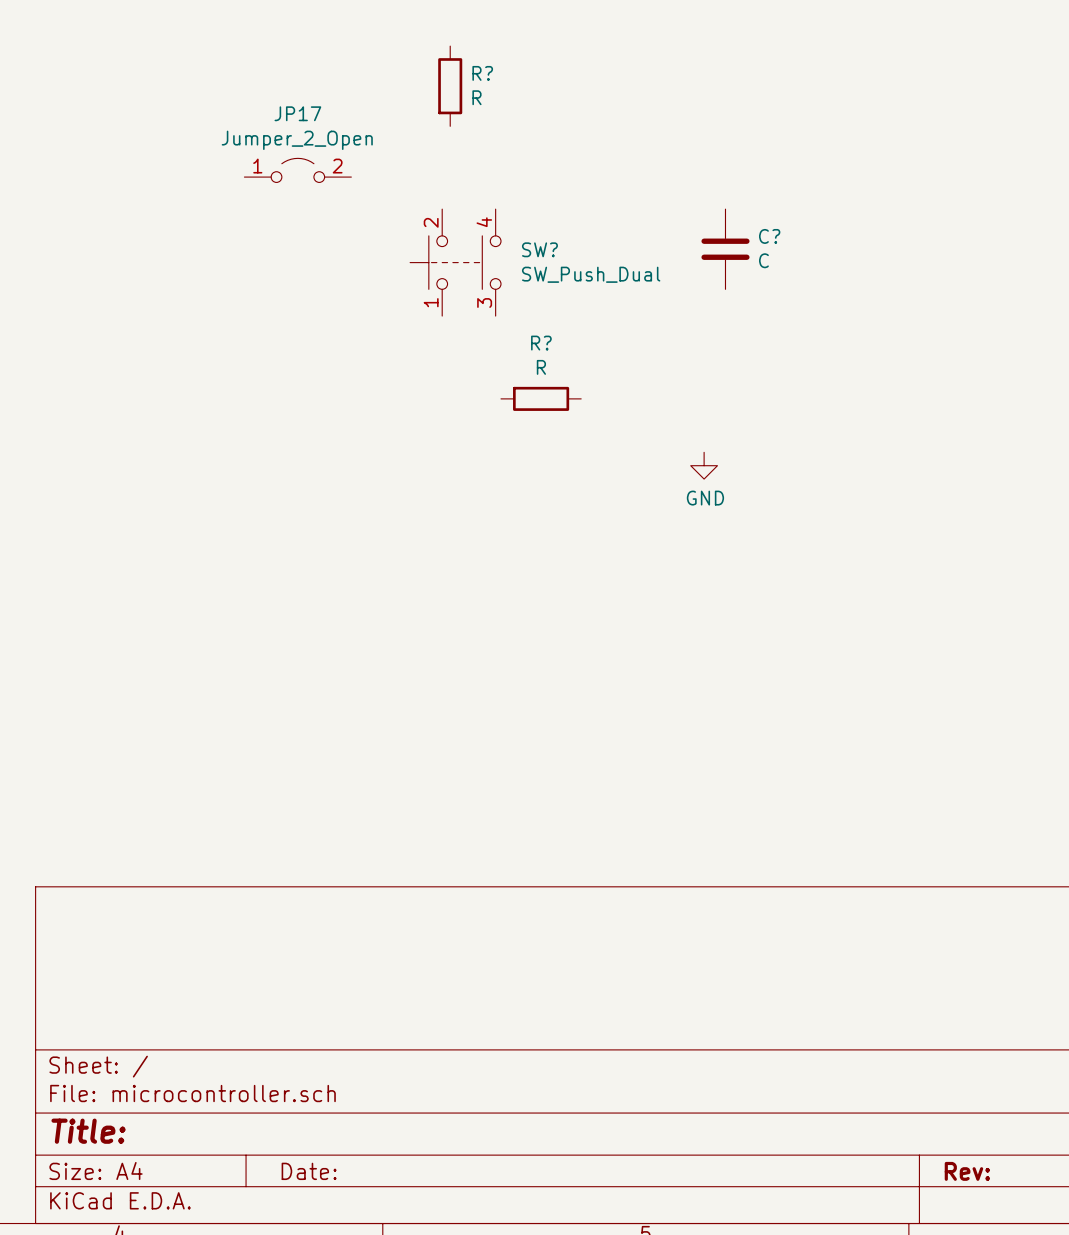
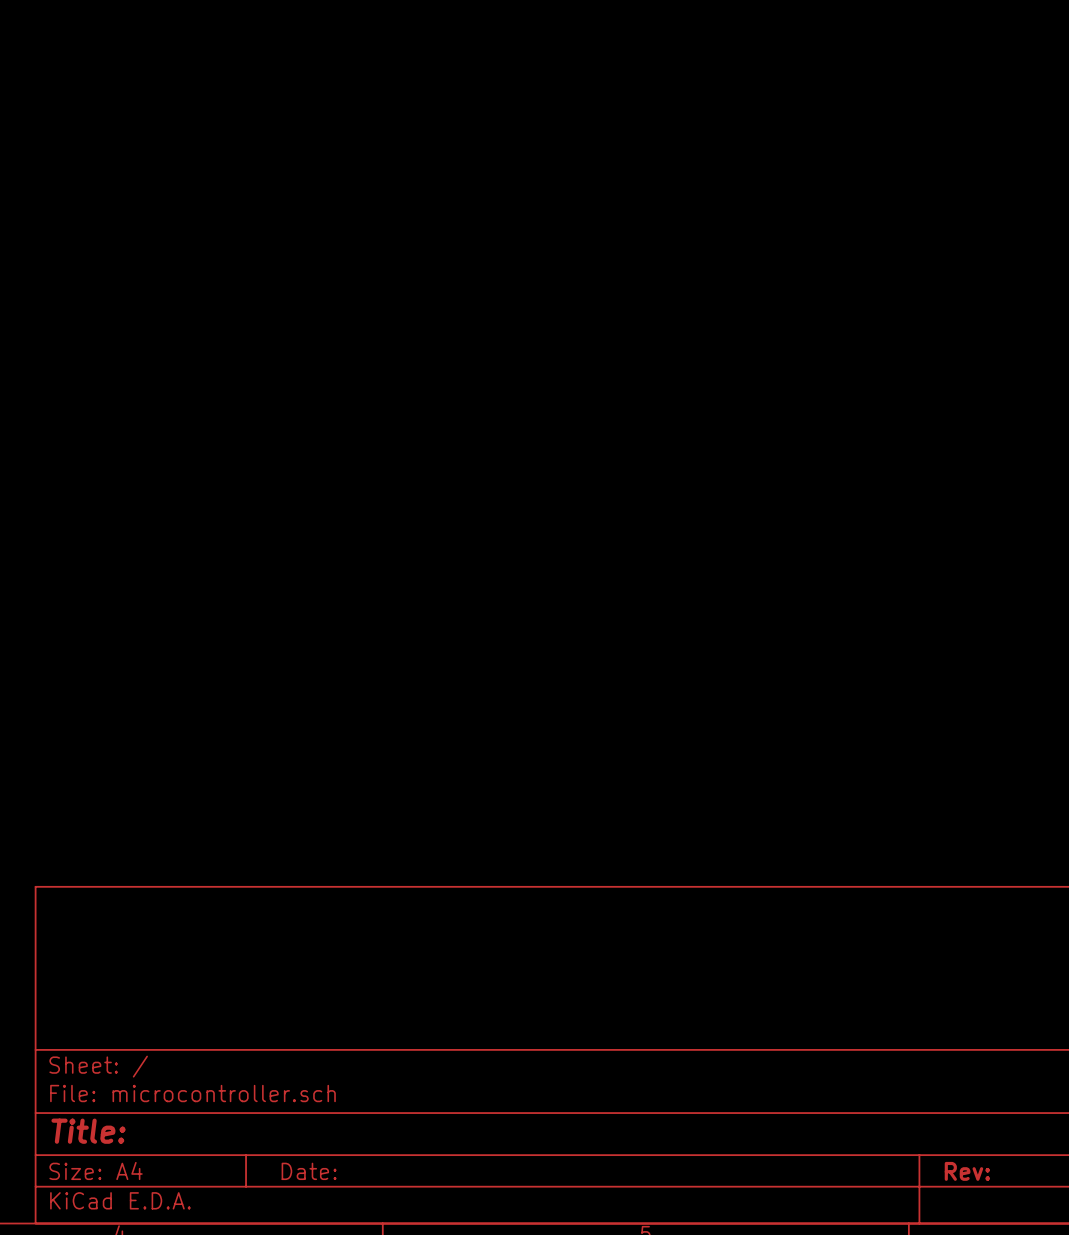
R?: R (450, 86) -> none
JP17: Jumper_2_Open (297, 170) -> none
C?: C (725, 249) -> none
SW?: SW_Push_Dual (455, 262) -> none
R?: R (541, 398) -> none
power symbol: GND (704, 465) -> none

